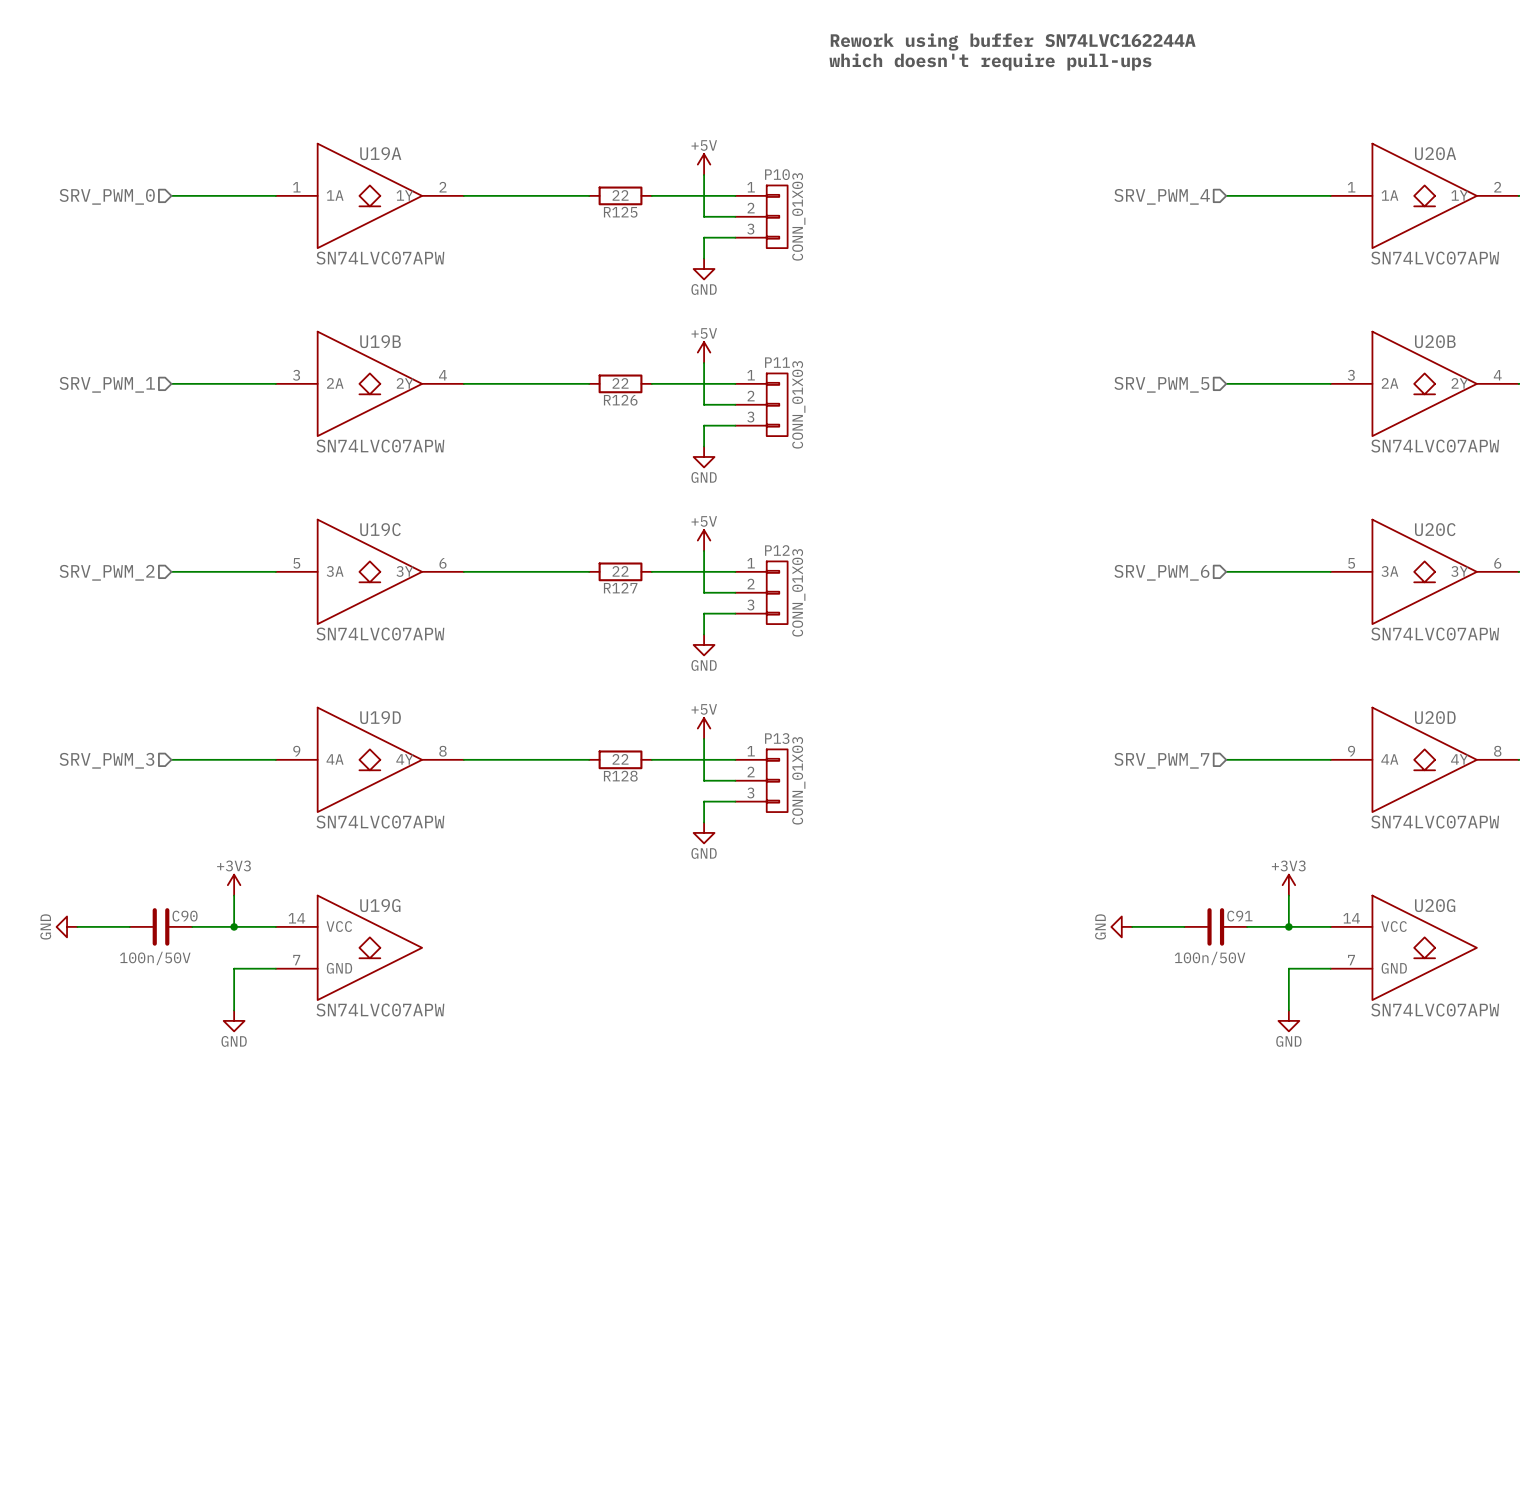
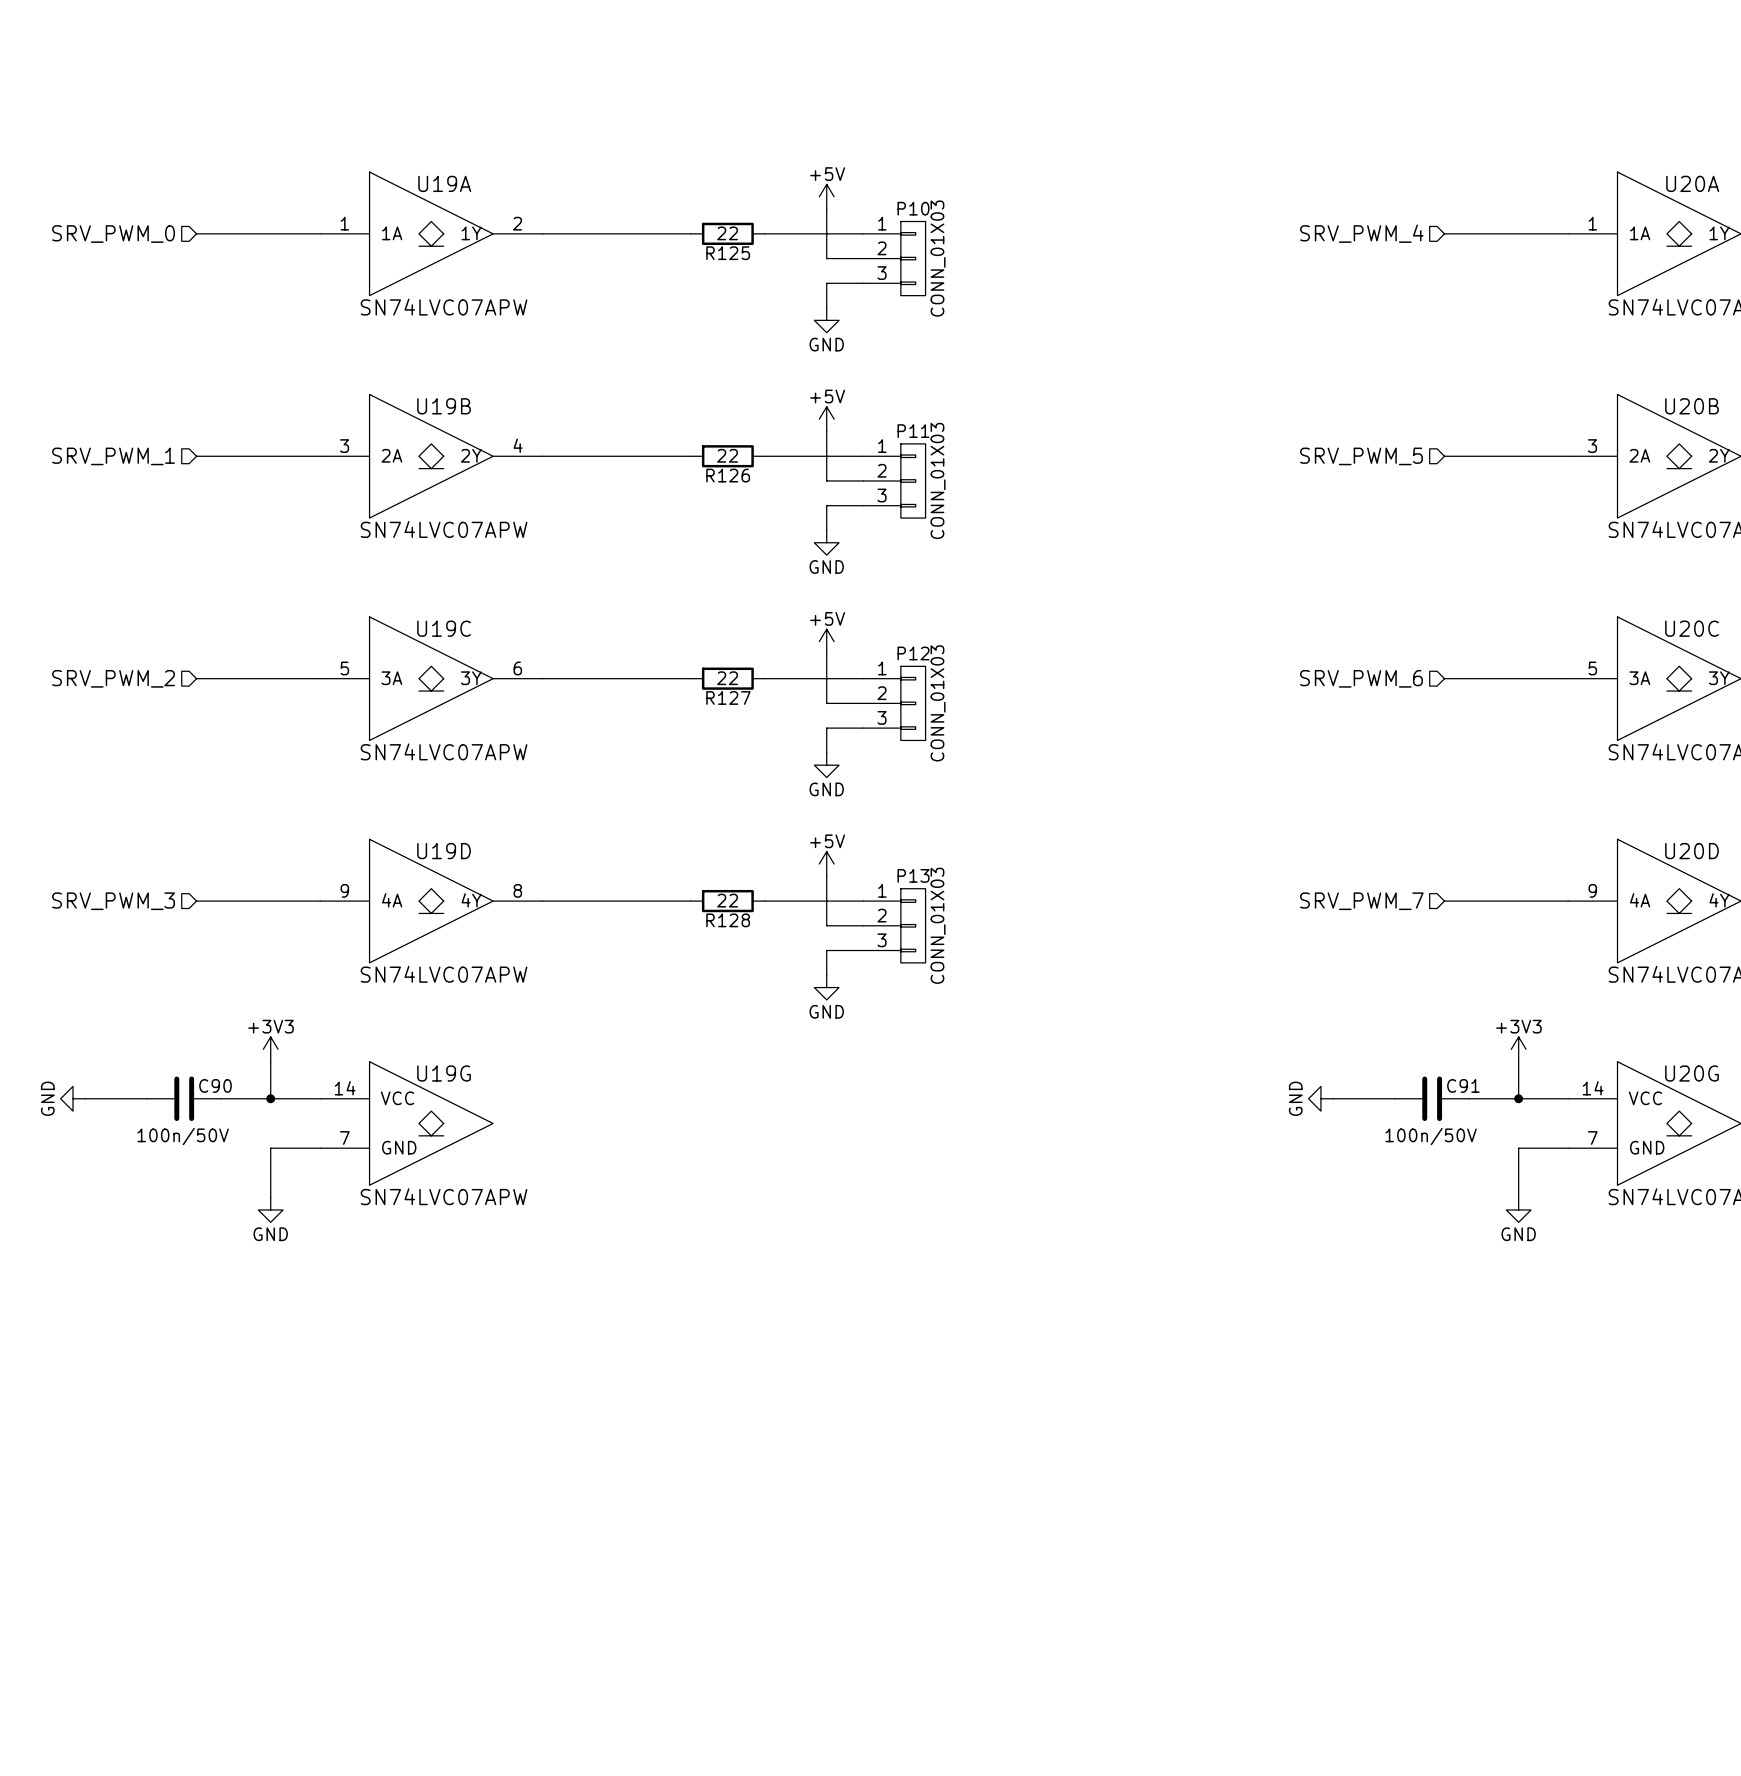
text: Rework using buffer SN74LVC162244A (1013, 41) -> none
text: which doesn't require pull-ups (990, 62) -> none

